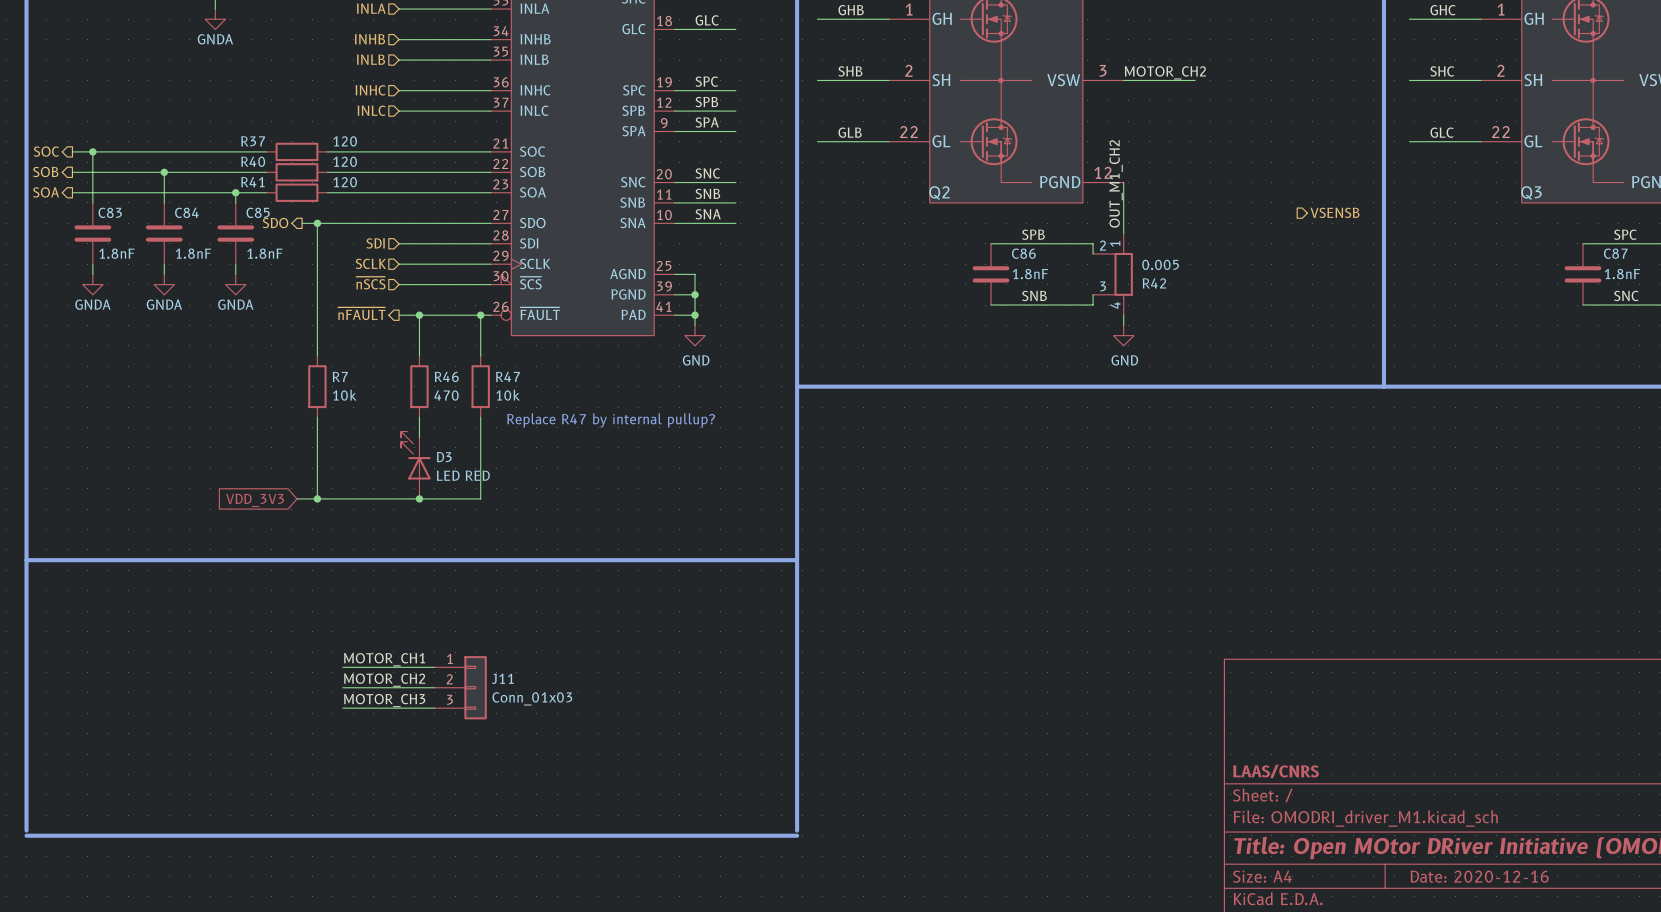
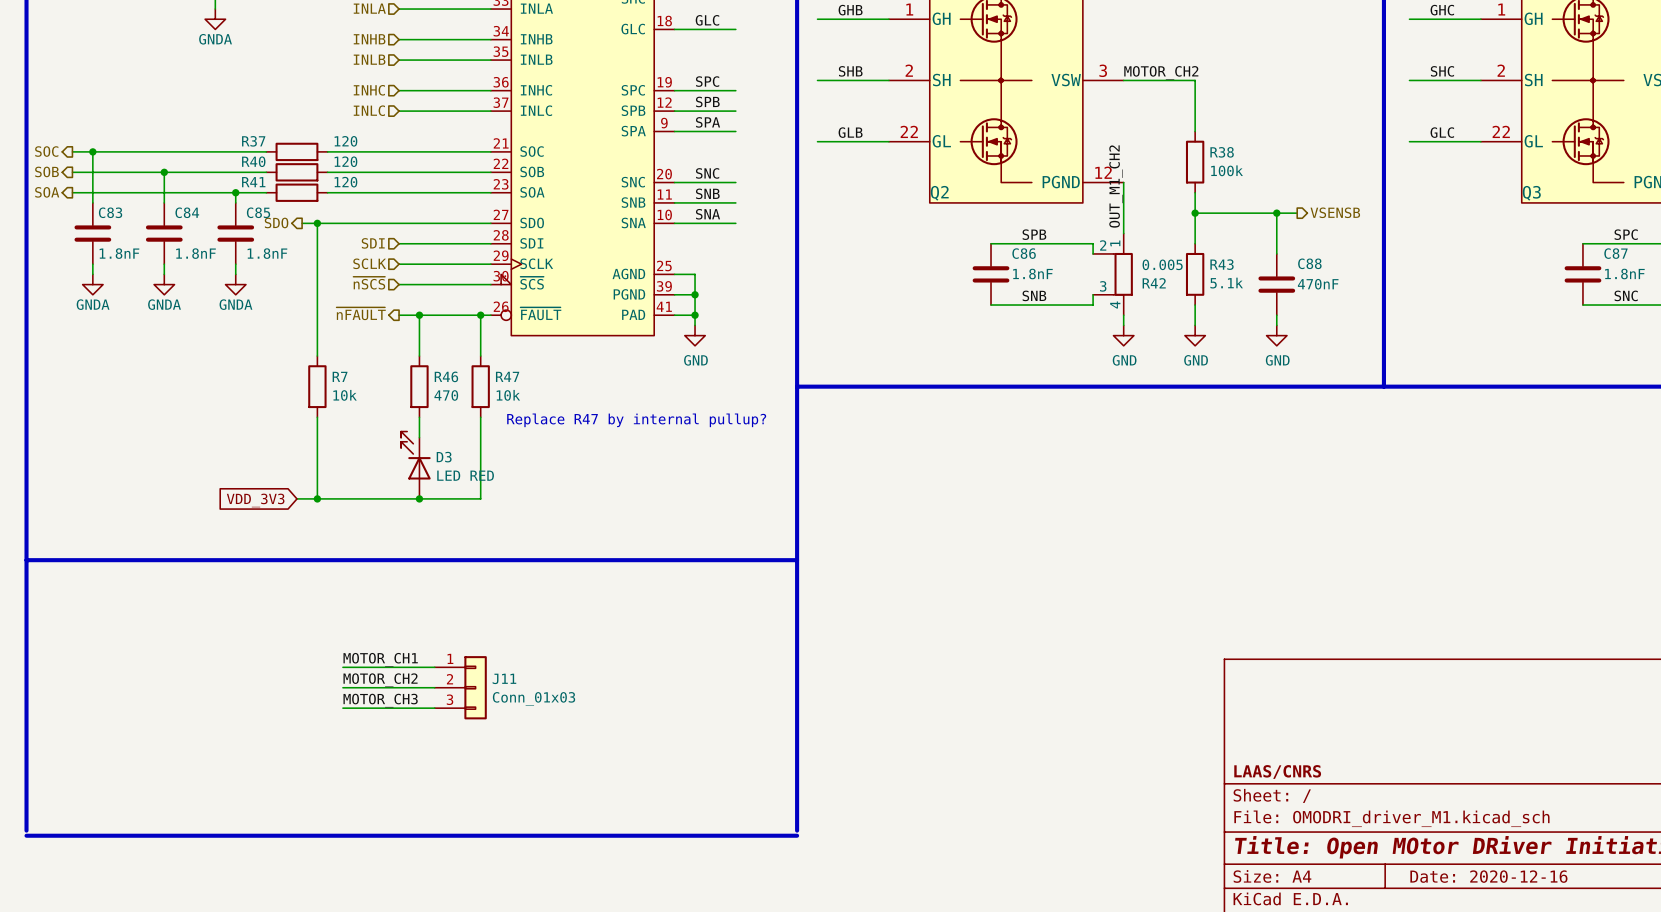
wire: none -> (1195, 80) (1195, 131)
R38: none -> 100k (1195, 162)
wire: none -> (1195, 192) (1195, 243)
wire: none -> (1195, 213) (1297, 213)
junction: none -> (1195, 213)
wire: none -> (1276, 213) (1276, 253)
junction: none -> (1276, 213)
R43: none -> 5.1k (1195, 274)
C88: none -> 470nF (1276, 284)
wire: none -> (1195, 305) (1195, 325)
wire: none -> (1276, 315) (1276, 325)
power symbol: none -> GND (1195, 335)
power symbol: none -> GND (1276, 335)

